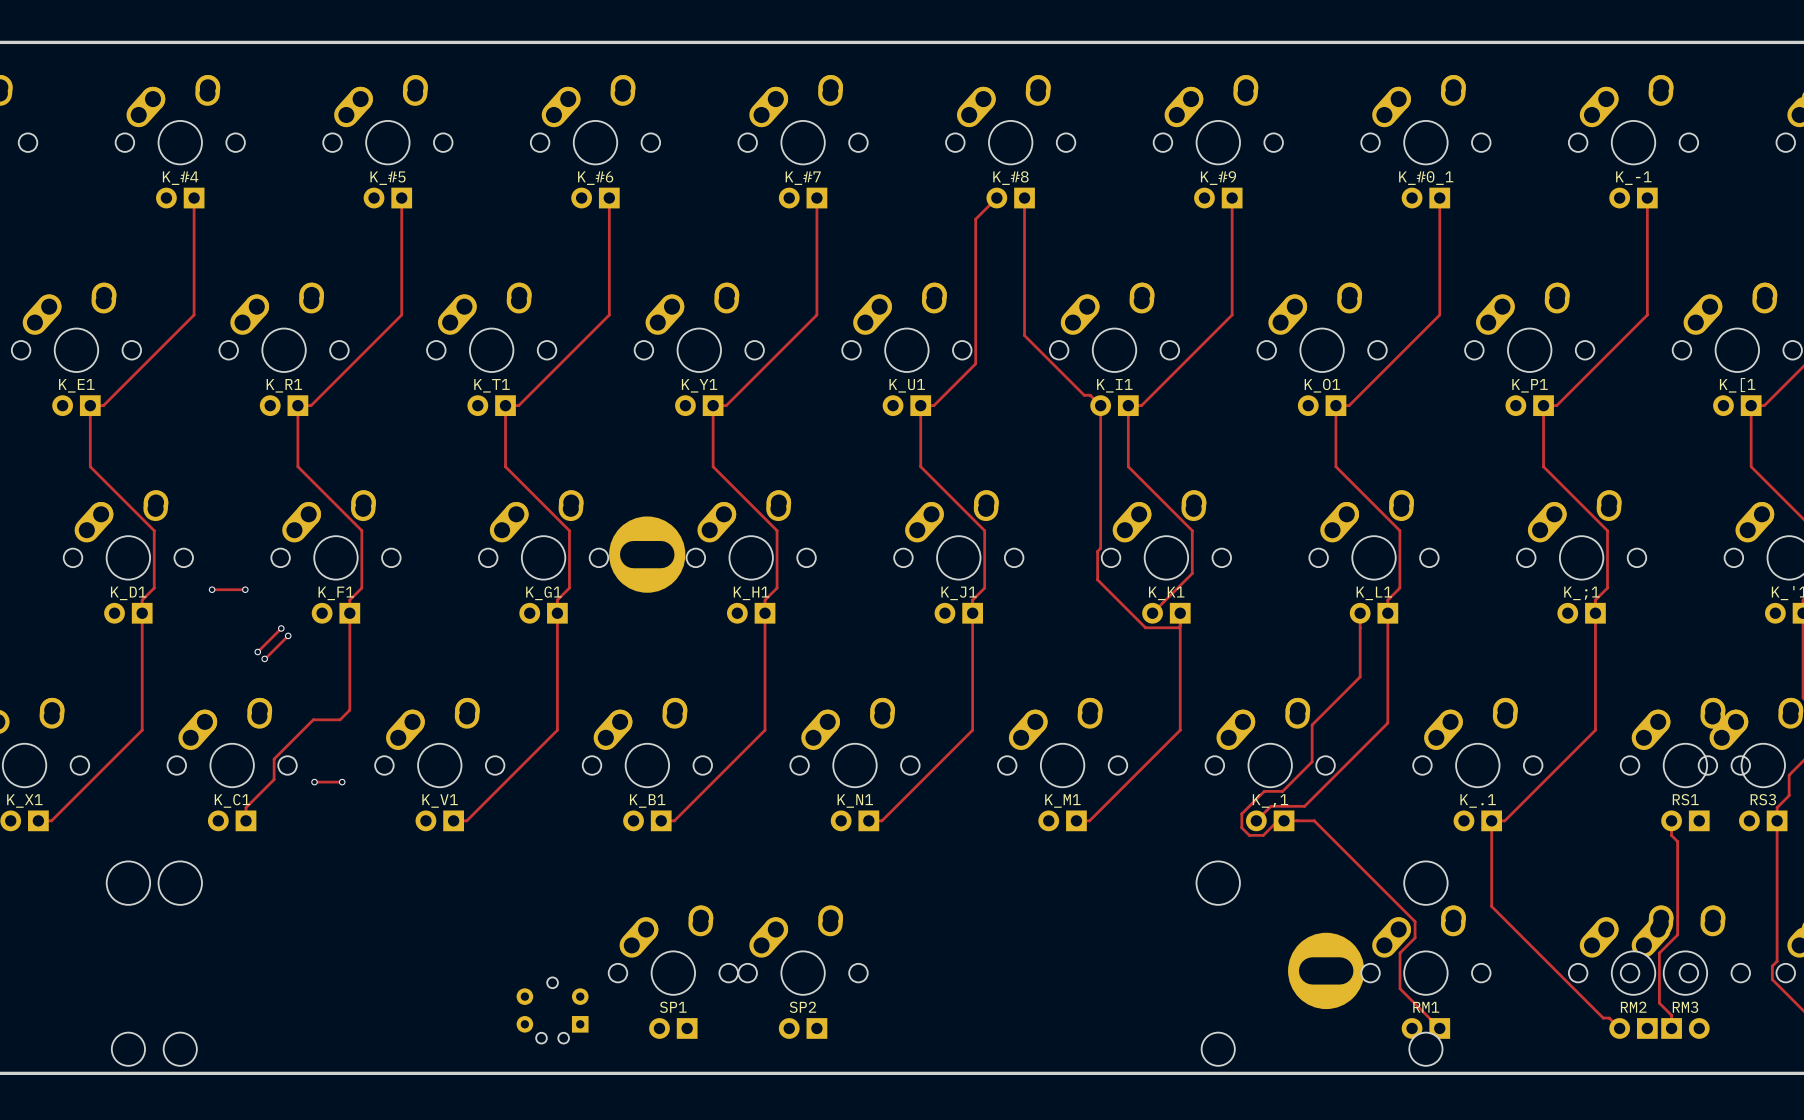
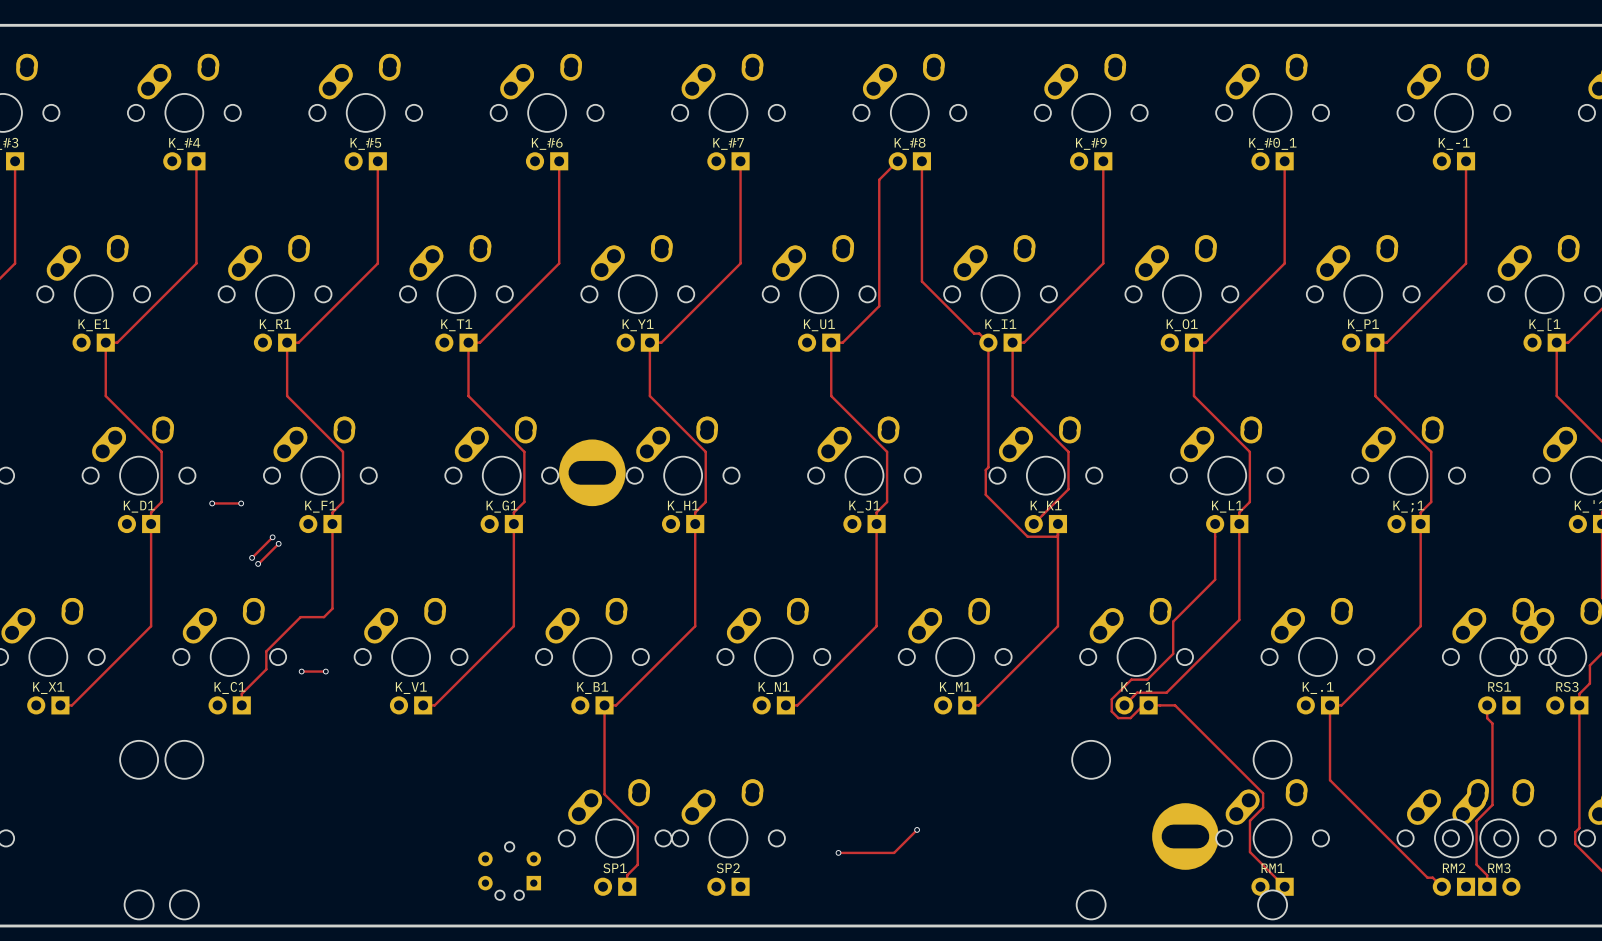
track: none -> (604, 705) (604, 794) (637, 827) (637, 864) (627, 875) (627, 886)
track: none -> (917, 829) (894, 852) (838, 852)
via: none -> (917, 829)
via: none -> (838, 852)

